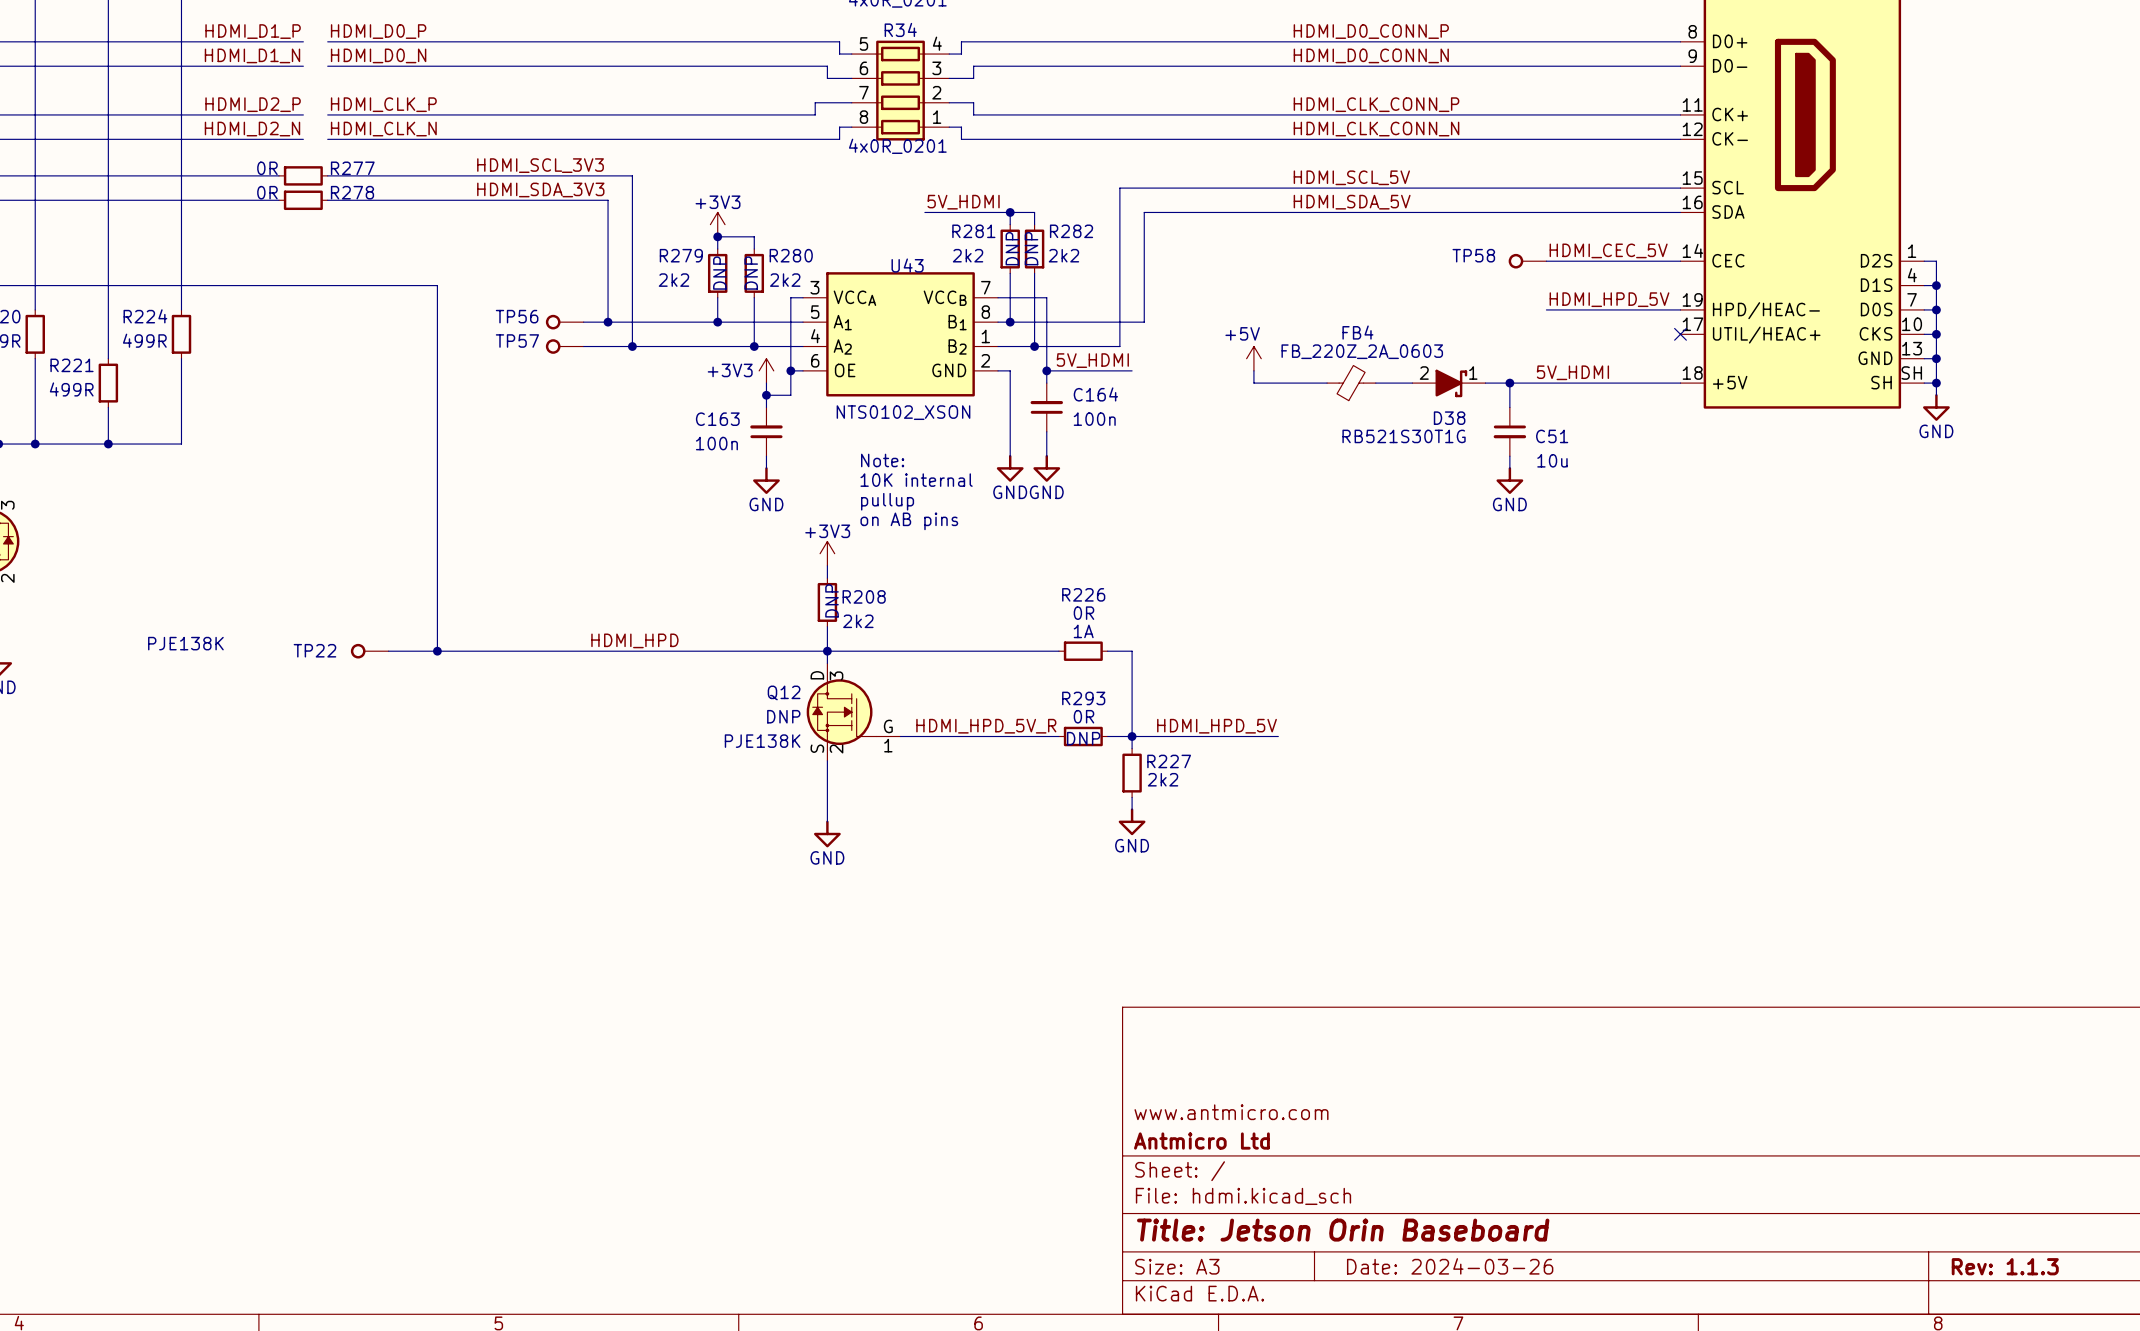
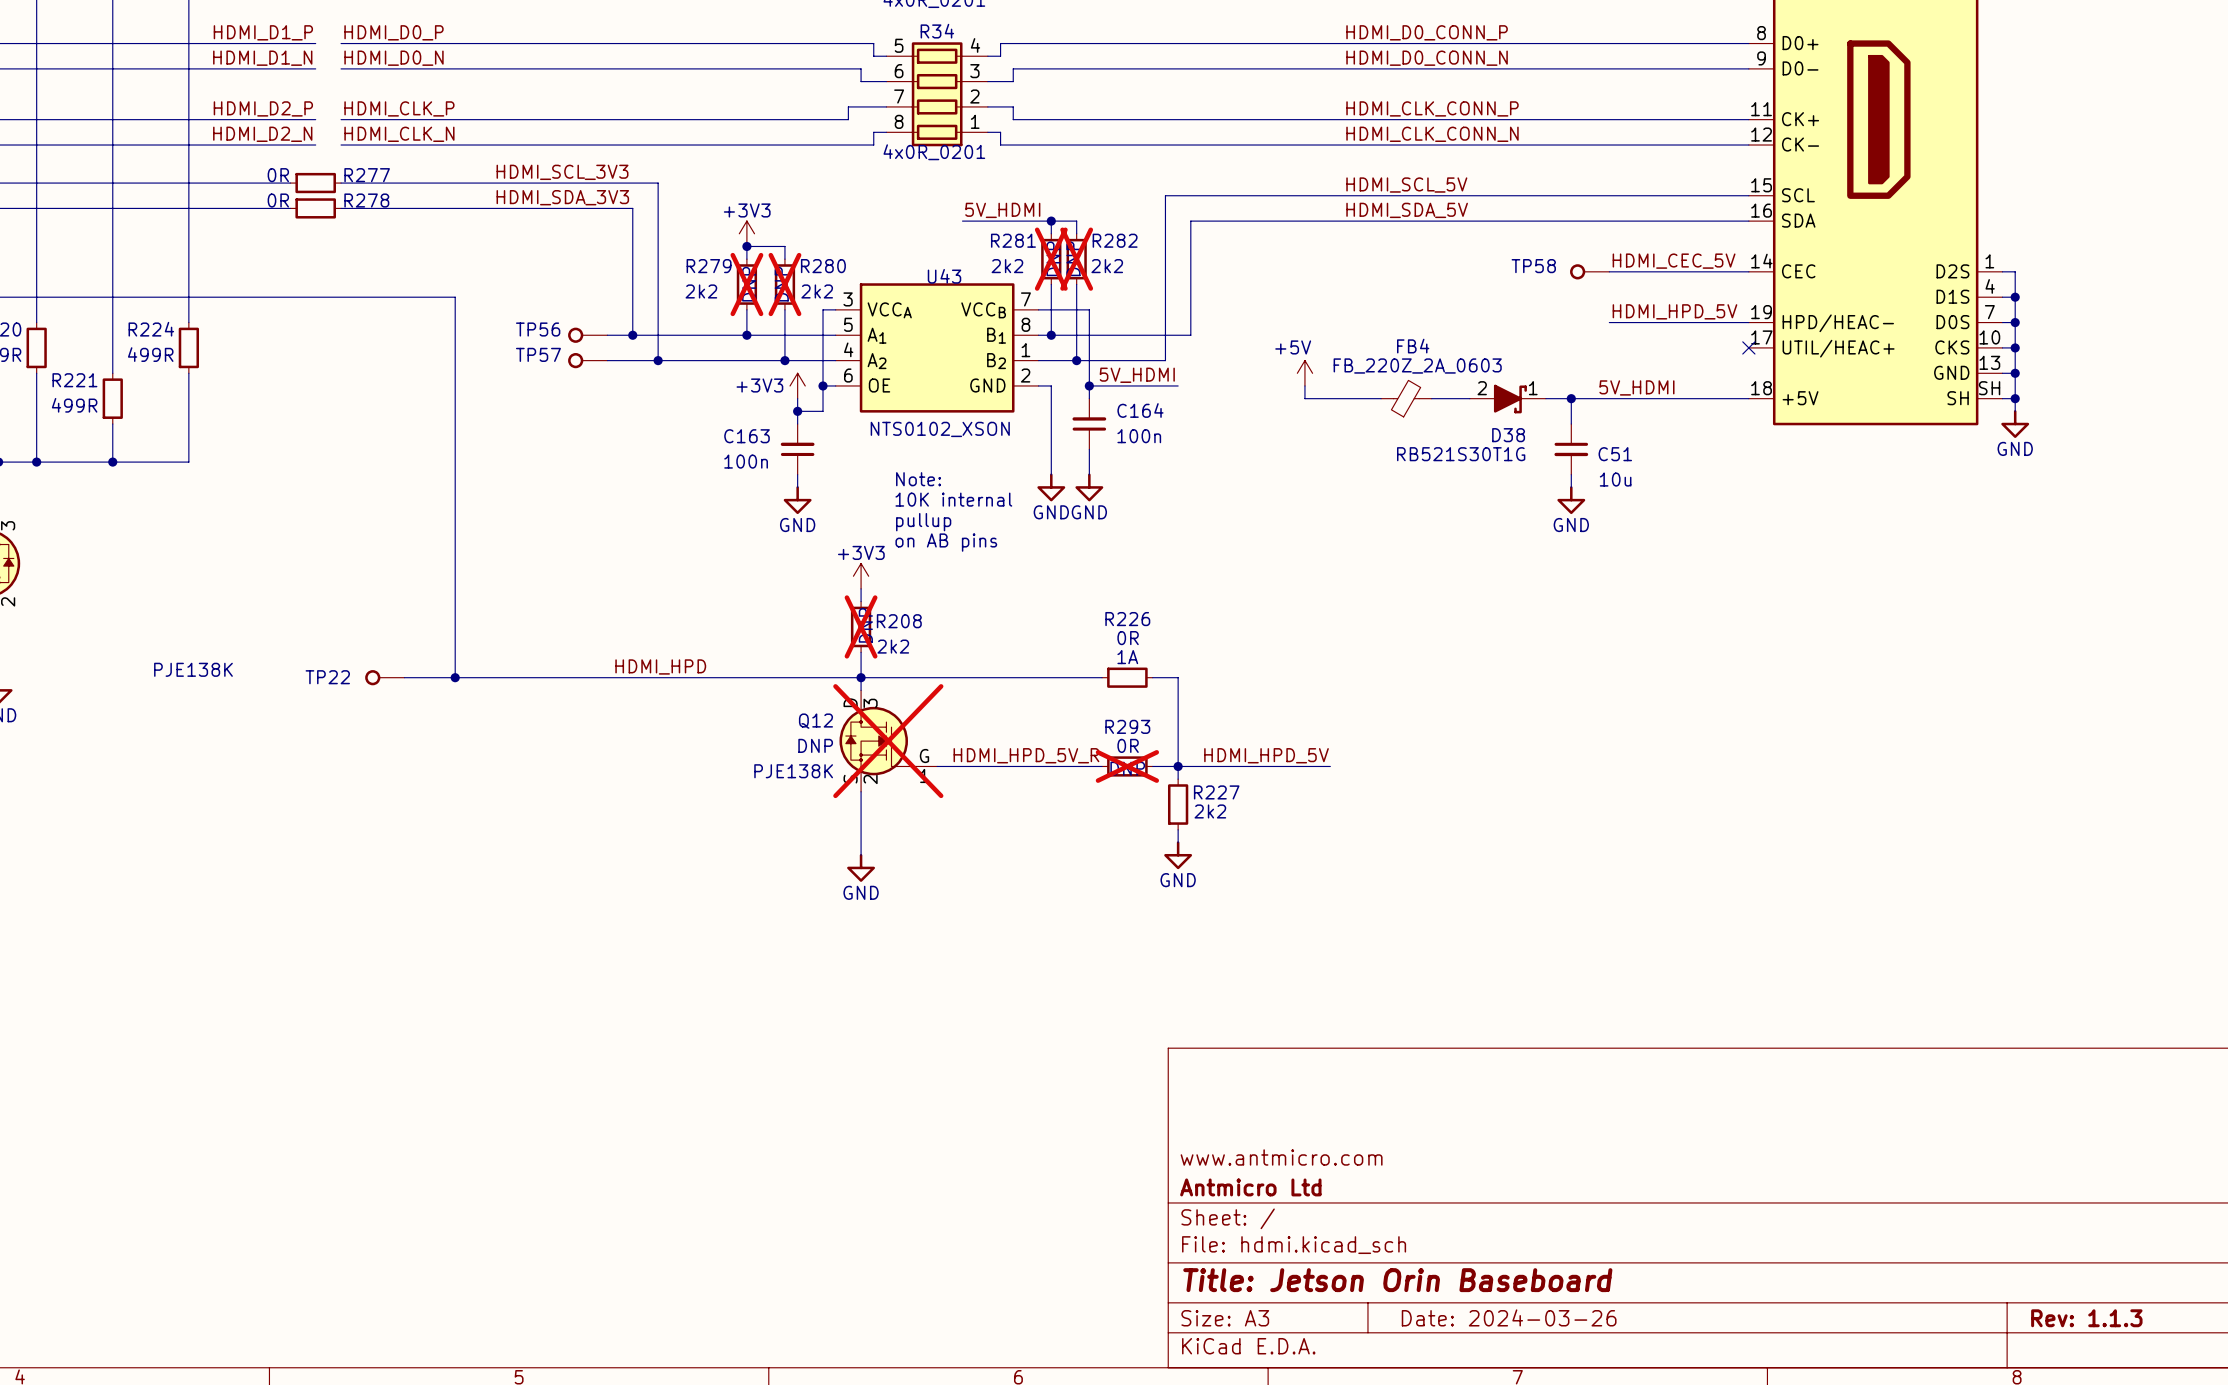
R281 do-not-place cross: none -> (1051, 259)
R282 do-not-place cross: none -> (1076, 259)
R279 do-not-place cross: none -> (746, 284)
R280 do-not-place cross: none -> (784, 284)
R208 do-not-place cross: none -> (861, 626)
Q12 do-not-place cross: none -> (888, 741)
R293 do-not-place cross: none -> (1127, 766)

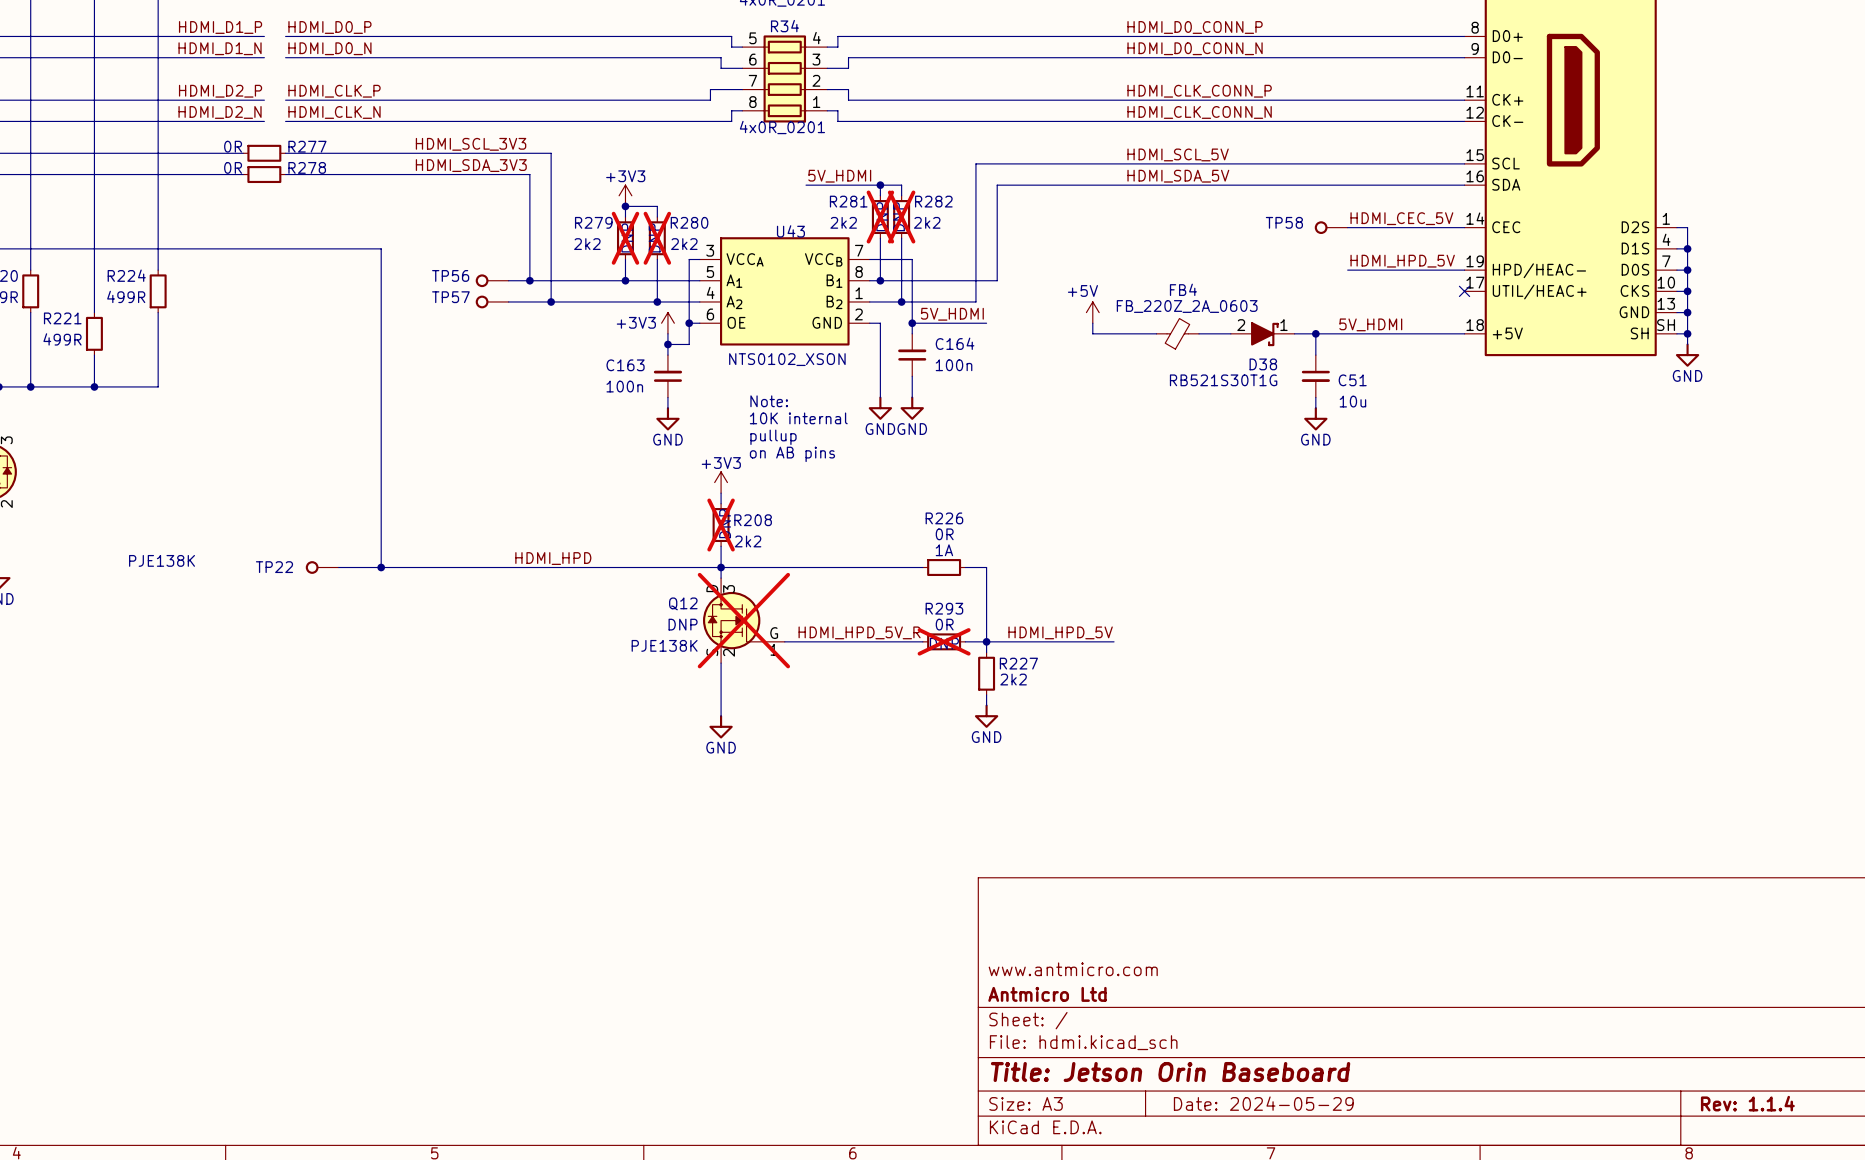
title block: Date: 2024-03-26 (1509, 1317) -> Date: 2024-05-29 (1263, 1103)
title block: Rev: 1.1.3 (2086, 1318) -> Rev: 1.1.4 (1747, 1103)

